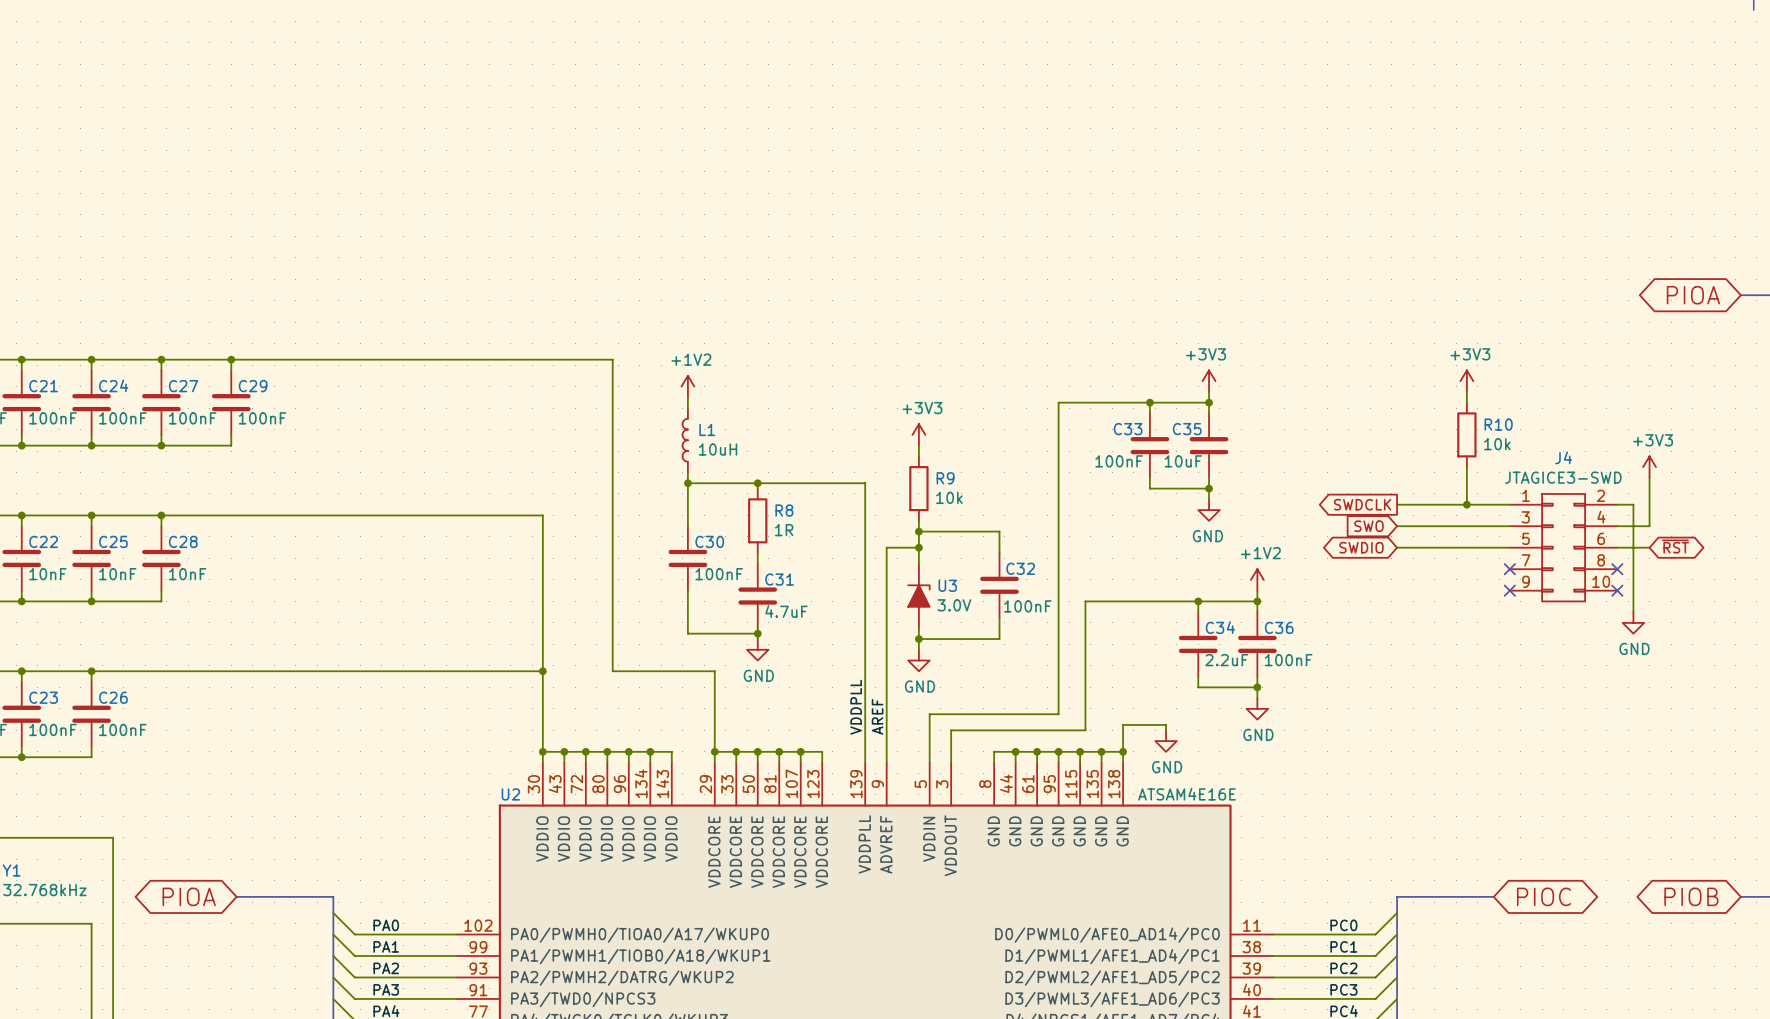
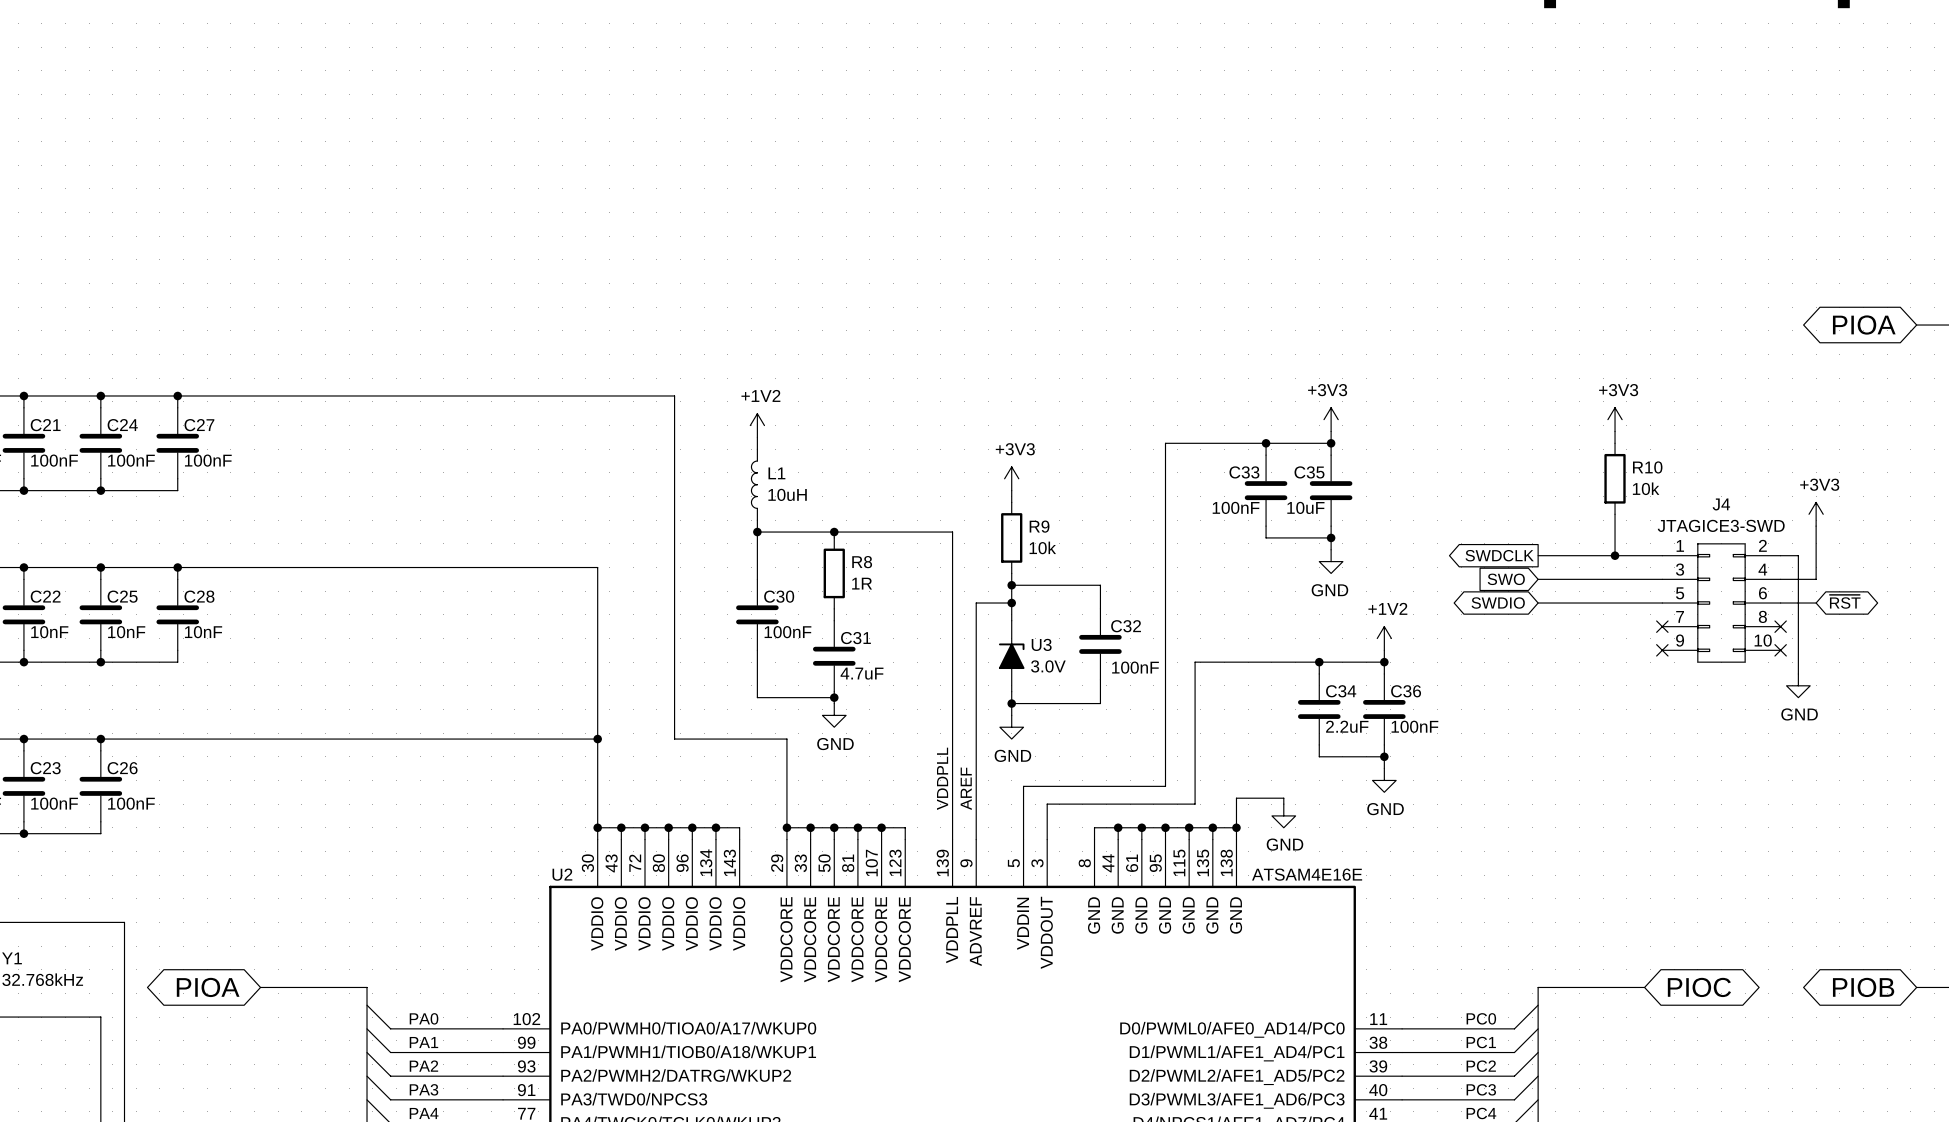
wire: (231, 359) (231, 370) -> none
junction: (231, 359) -> none
C29: 100nF (231, 402) -> none
wire: (231, 434) (231, 445) (161, 445) -> none
junction: (161, 445) -> none

